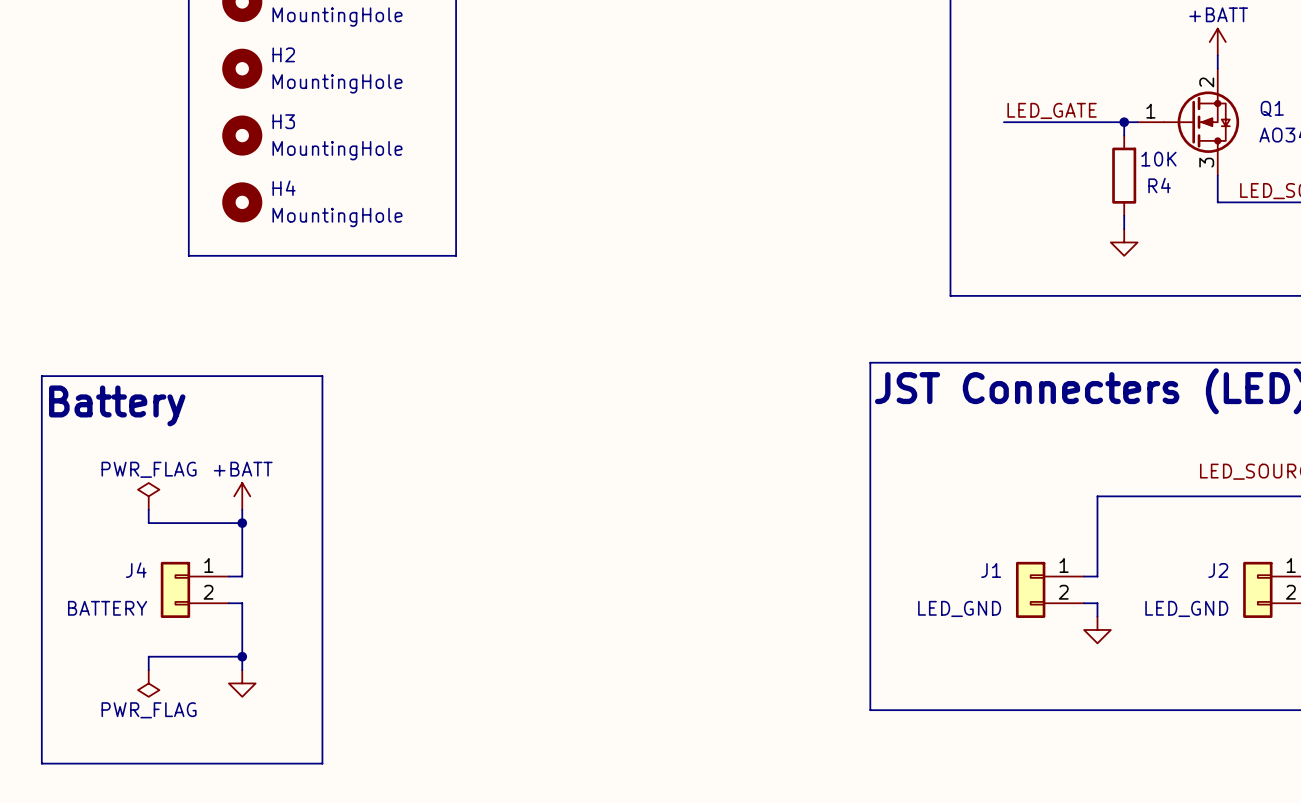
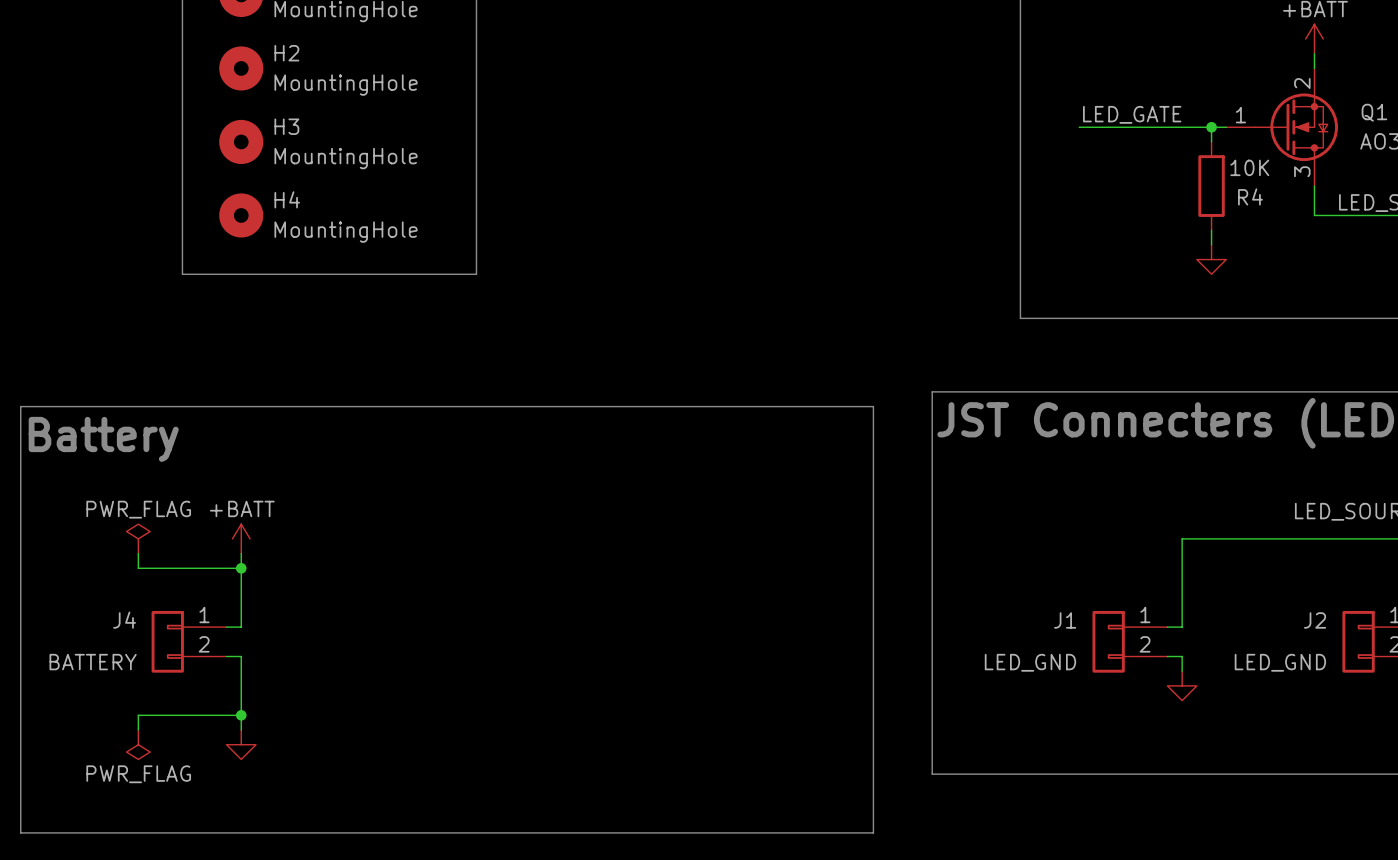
line: (322, 376) (322, 763) -> (329, 406) (873, 406) (873, 832) (329, 832)

